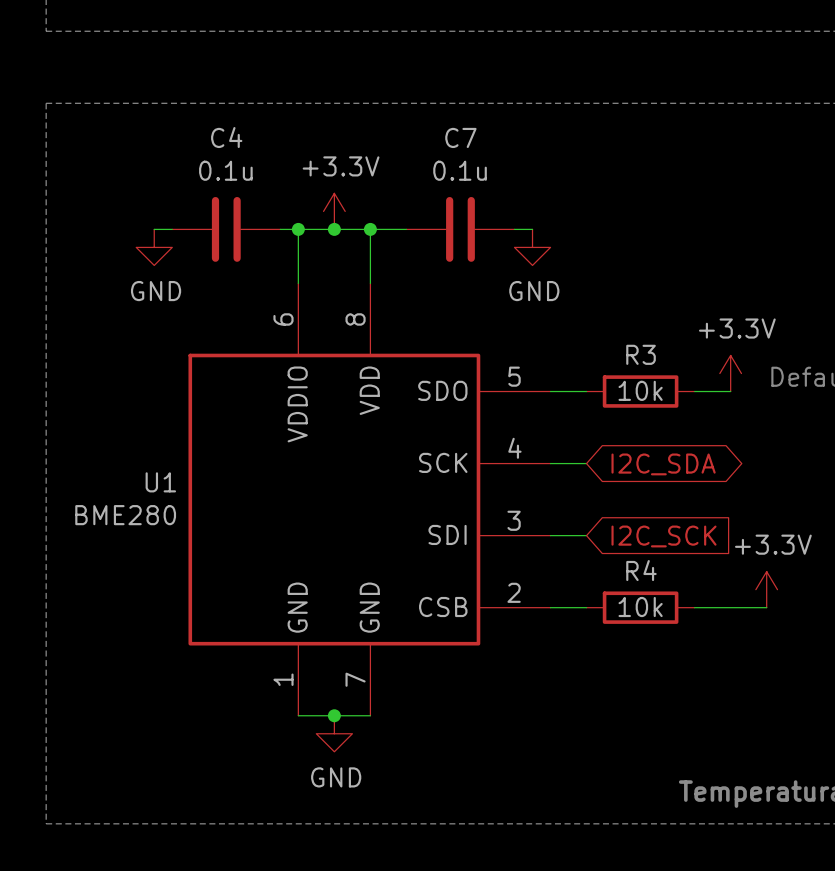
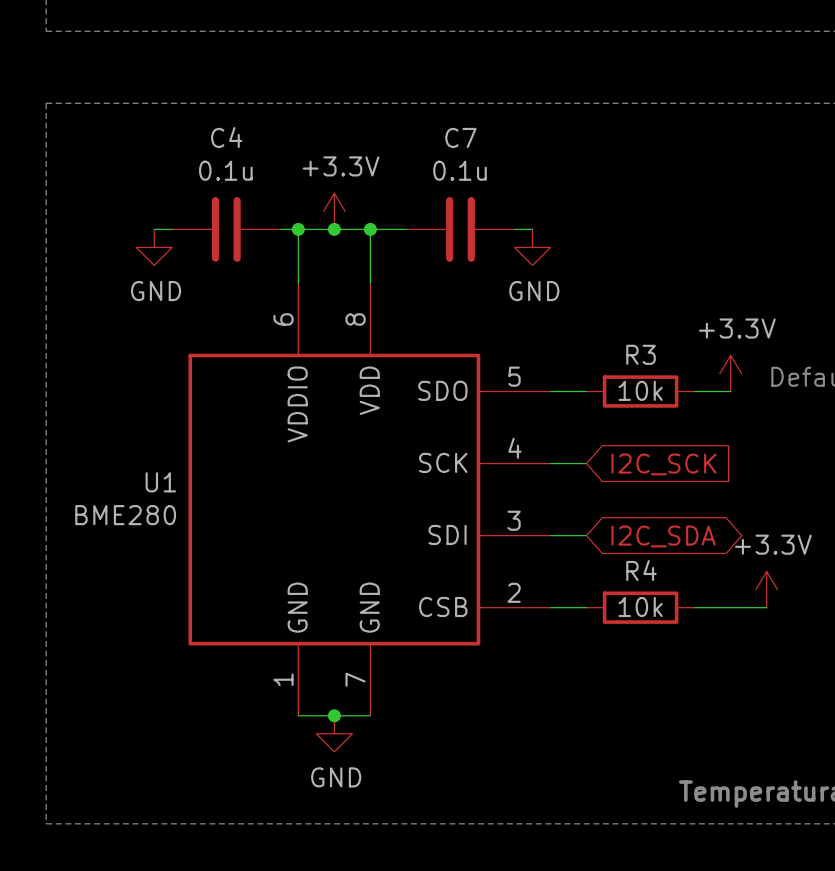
global label shape: bidirectional (663, 464) -> input (664, 464)
global label: I2C_SDA (663, 464) -> I2C_SCK (664, 464)
global label shape: input (664, 536) -> bidirectional (663, 536)
global label: I2C_SCK (664, 536) -> I2C_SDA (663, 536)

